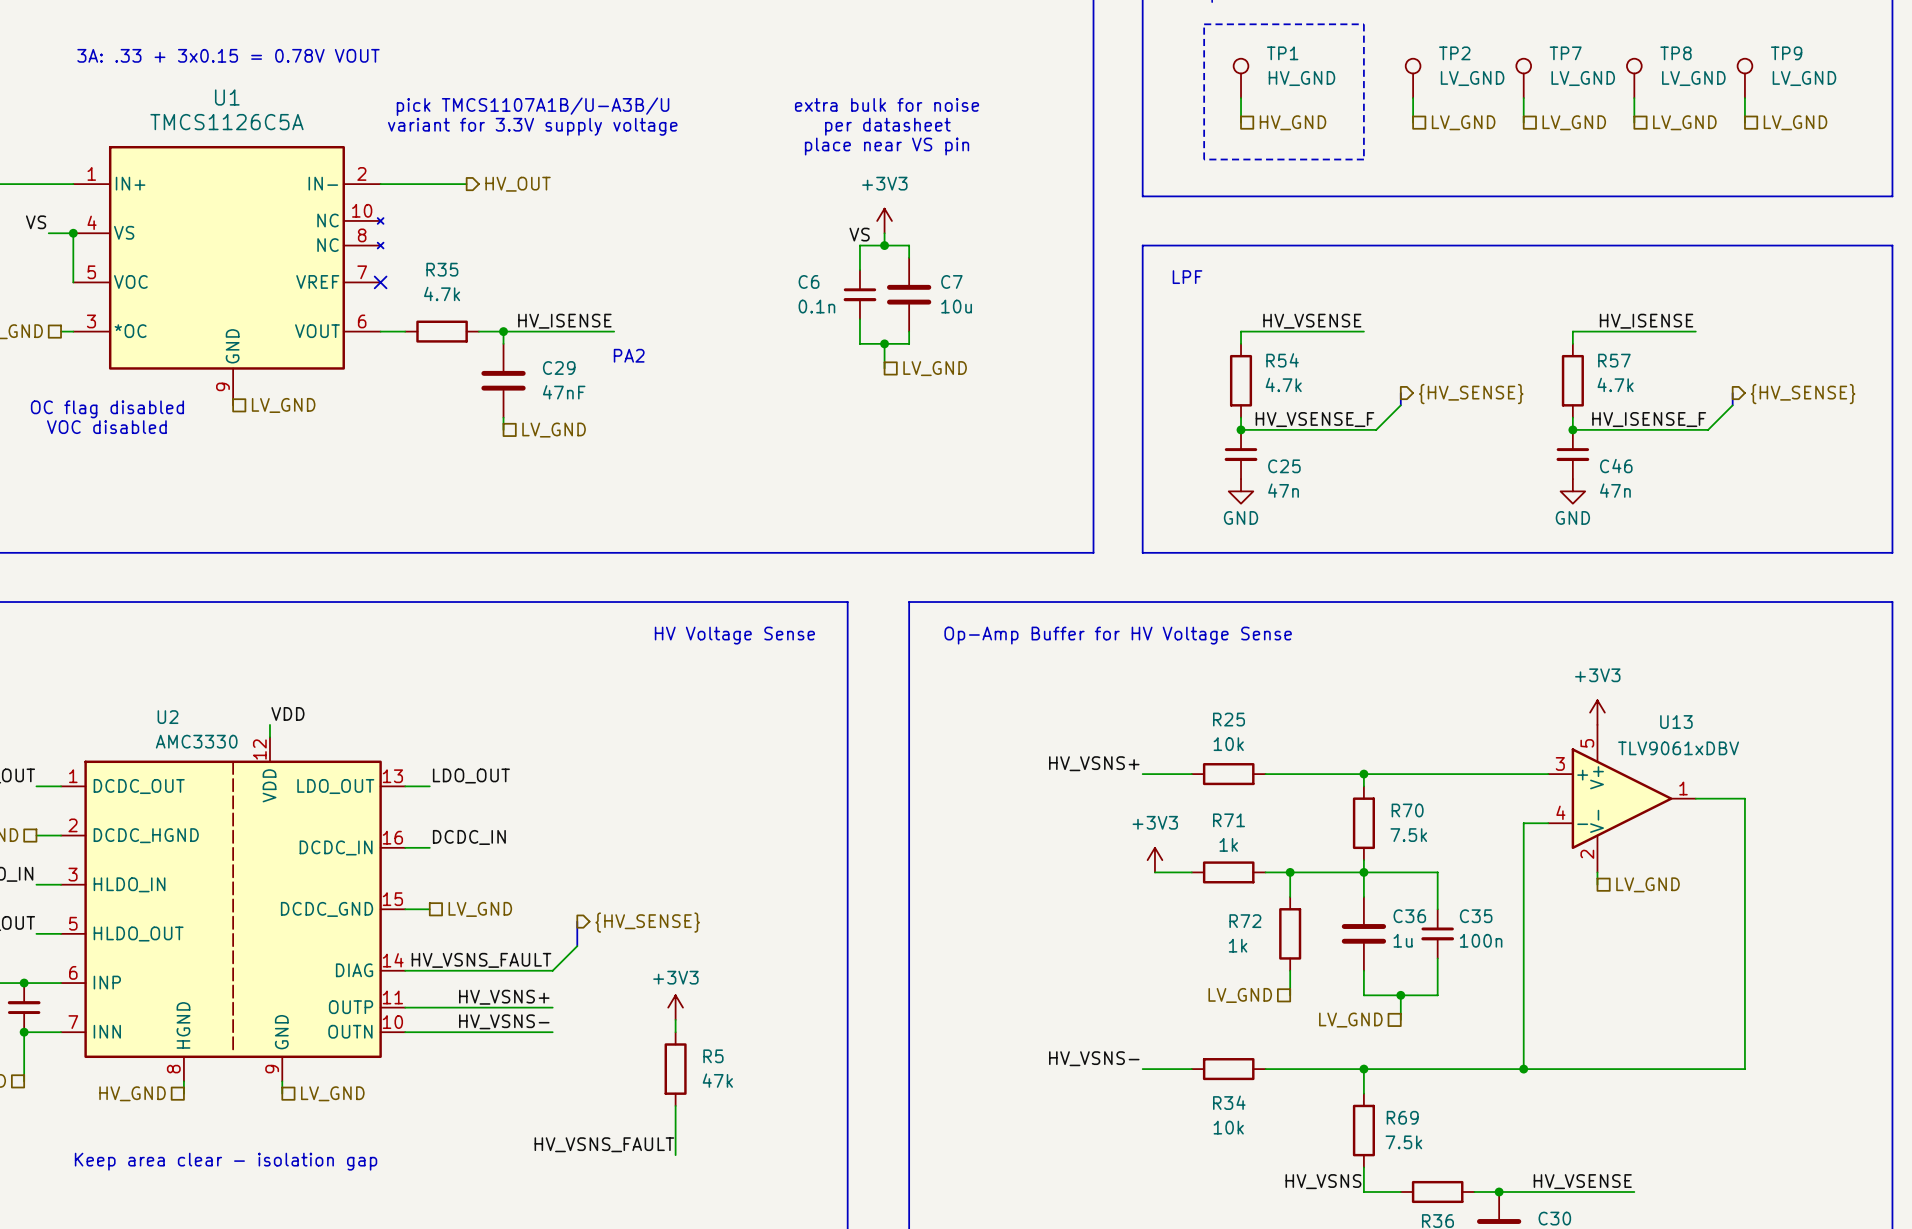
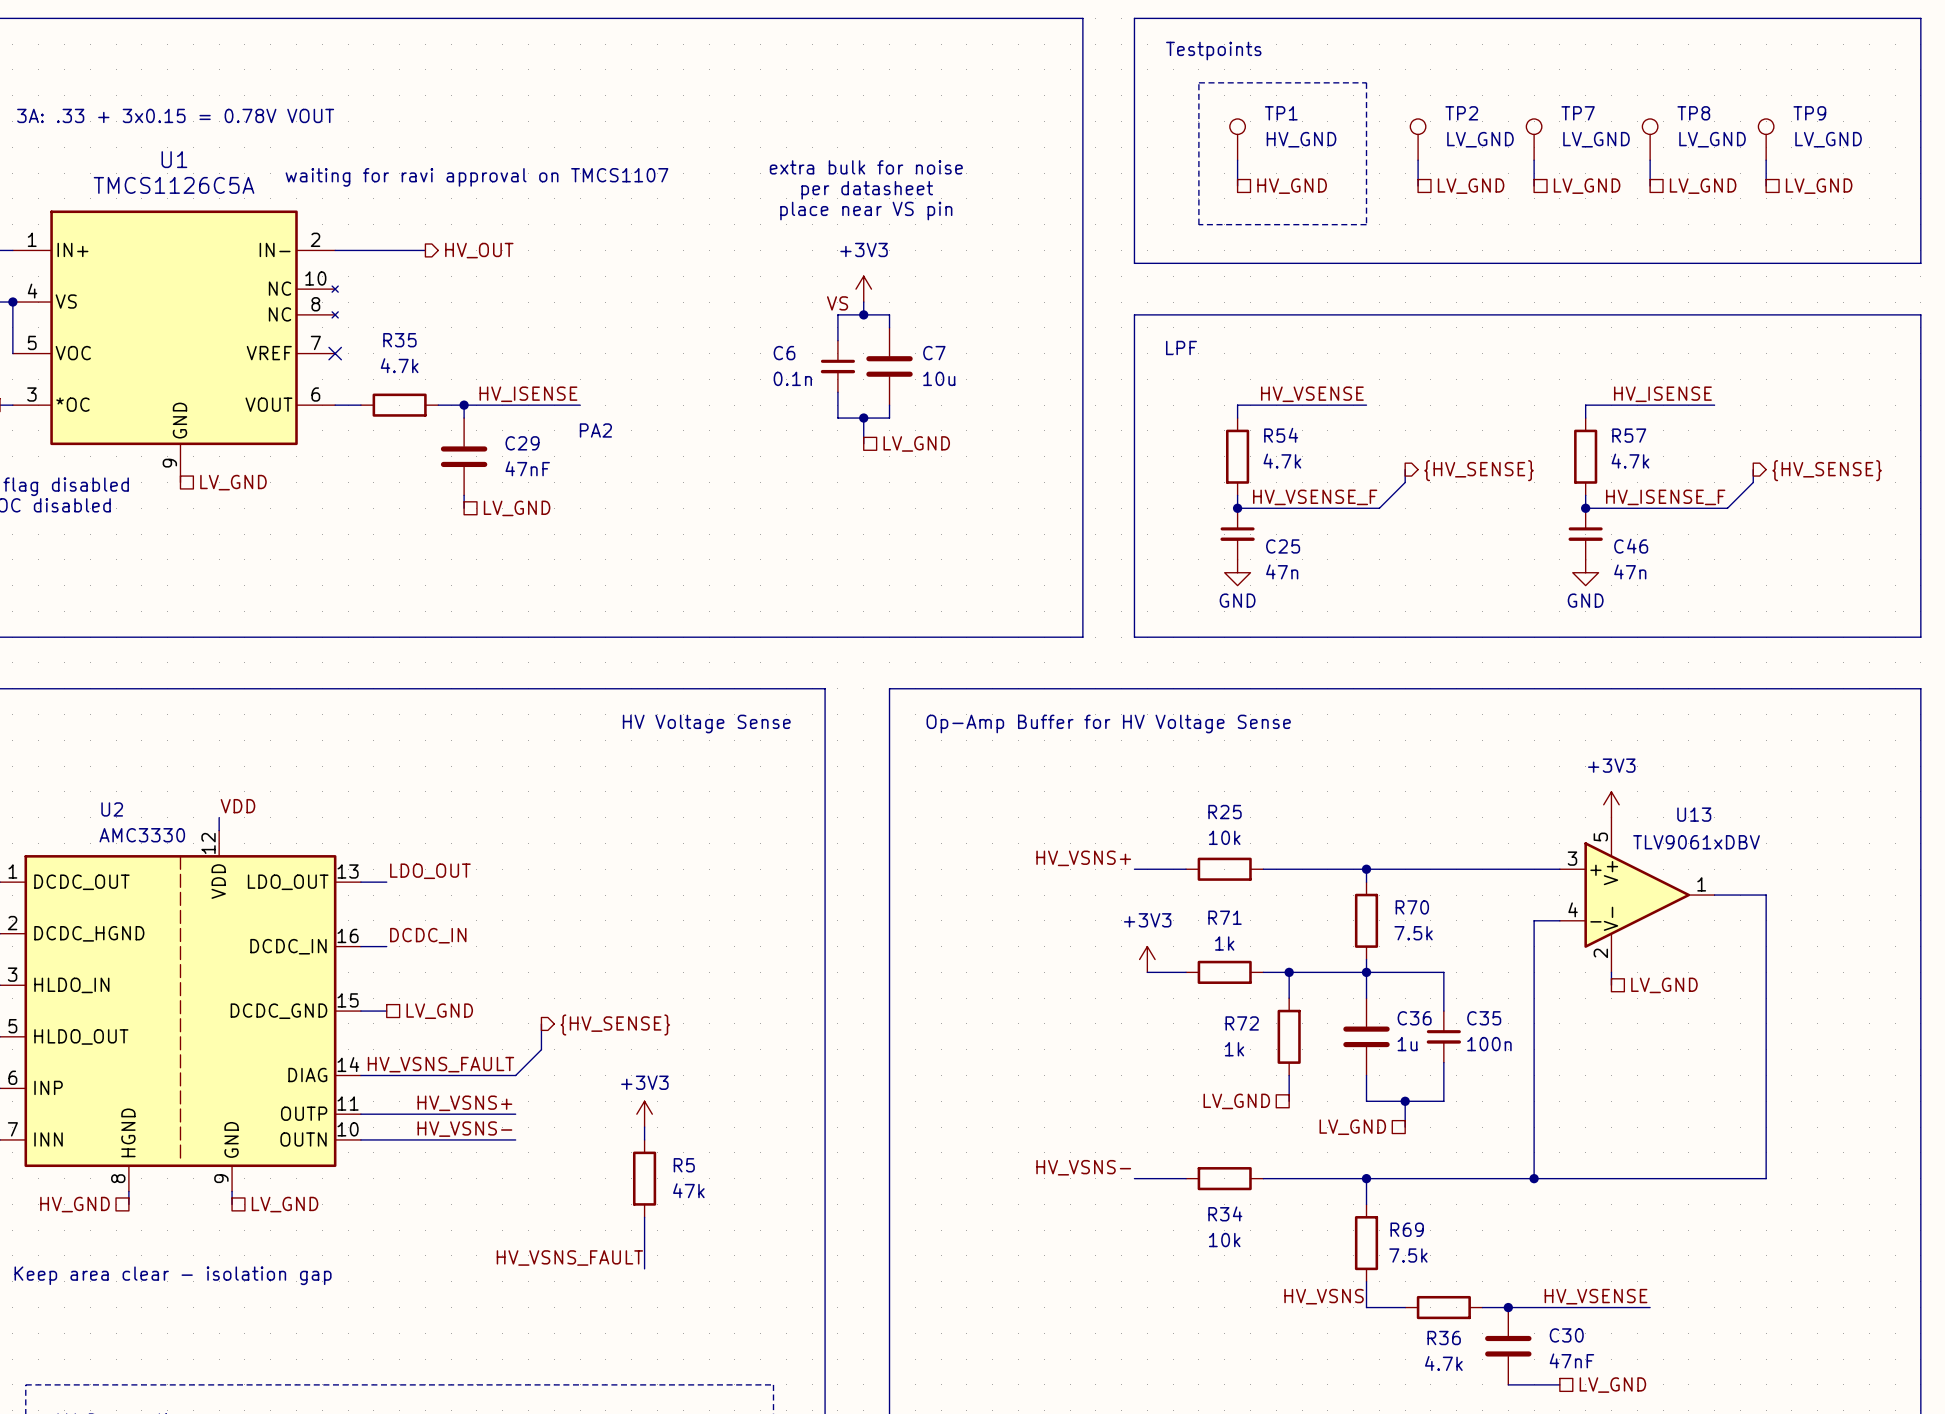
text: pick TMCS1107A1B/U-A3B/U (533, 106) -> none
text: none -> waiting for ravi approval on TMCS1107 (476, 177)
text: variant for 3.3V supply voltage (532, 126) -> none

